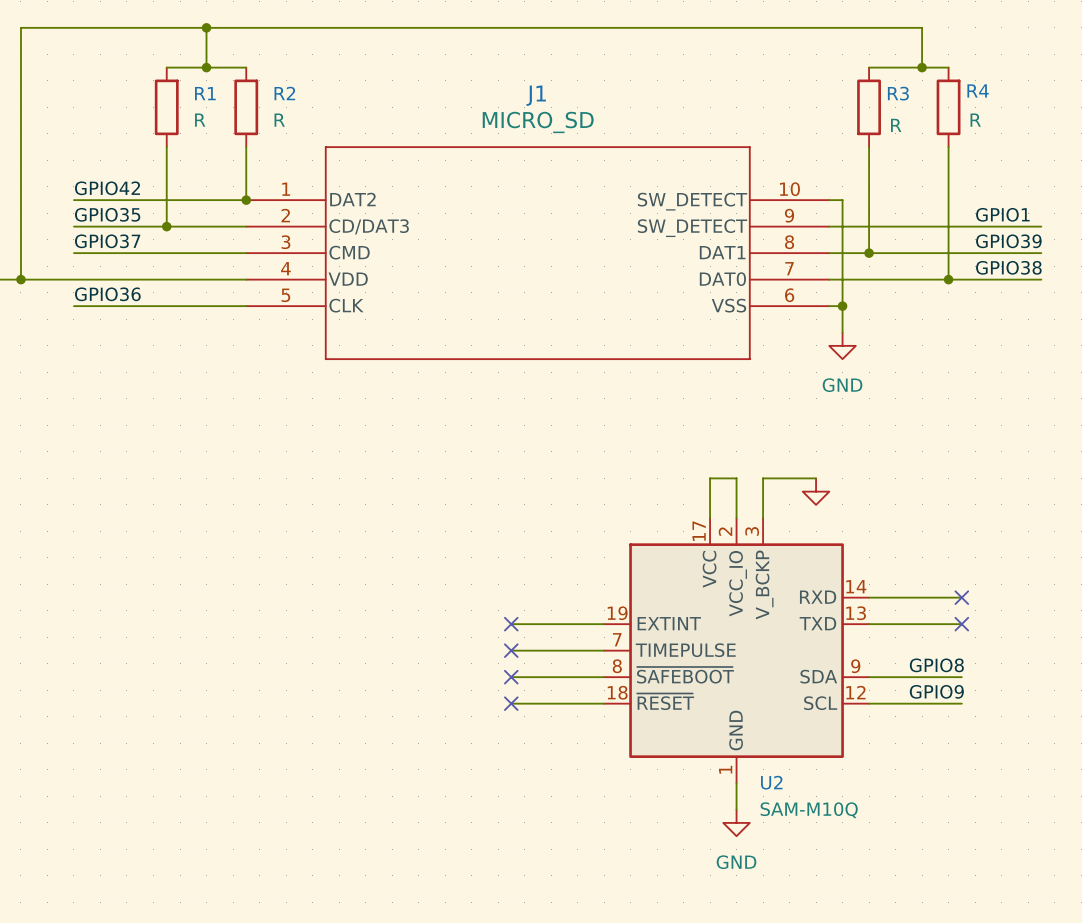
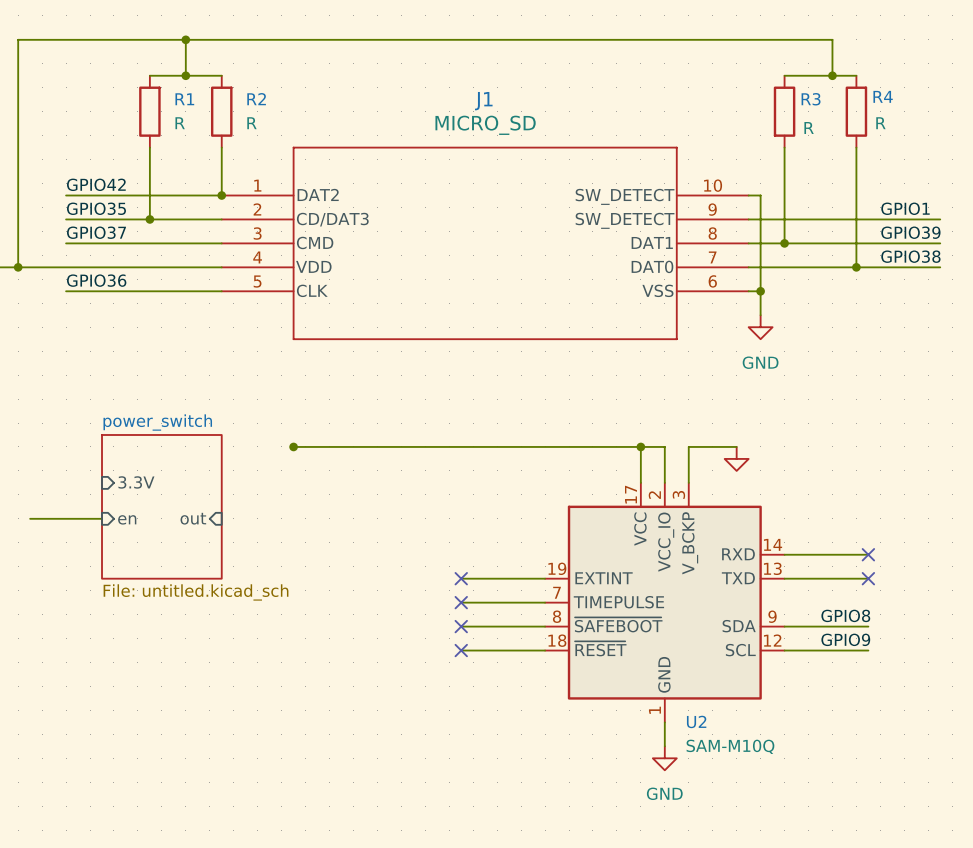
wire: none -> (293, 446) (640, 446)
junction: none -> (293, 446)
junction: none -> (640, 446)
sheet pin: none -> 3.3V (136, 482)
sheet power_switch: none -> File: untitled.kicad_sch (161, 506)
wire: none -> (30, 518) (102, 518)
sheet pin: none -> out (193, 518)
sheet pin: none -> en (127, 519)

